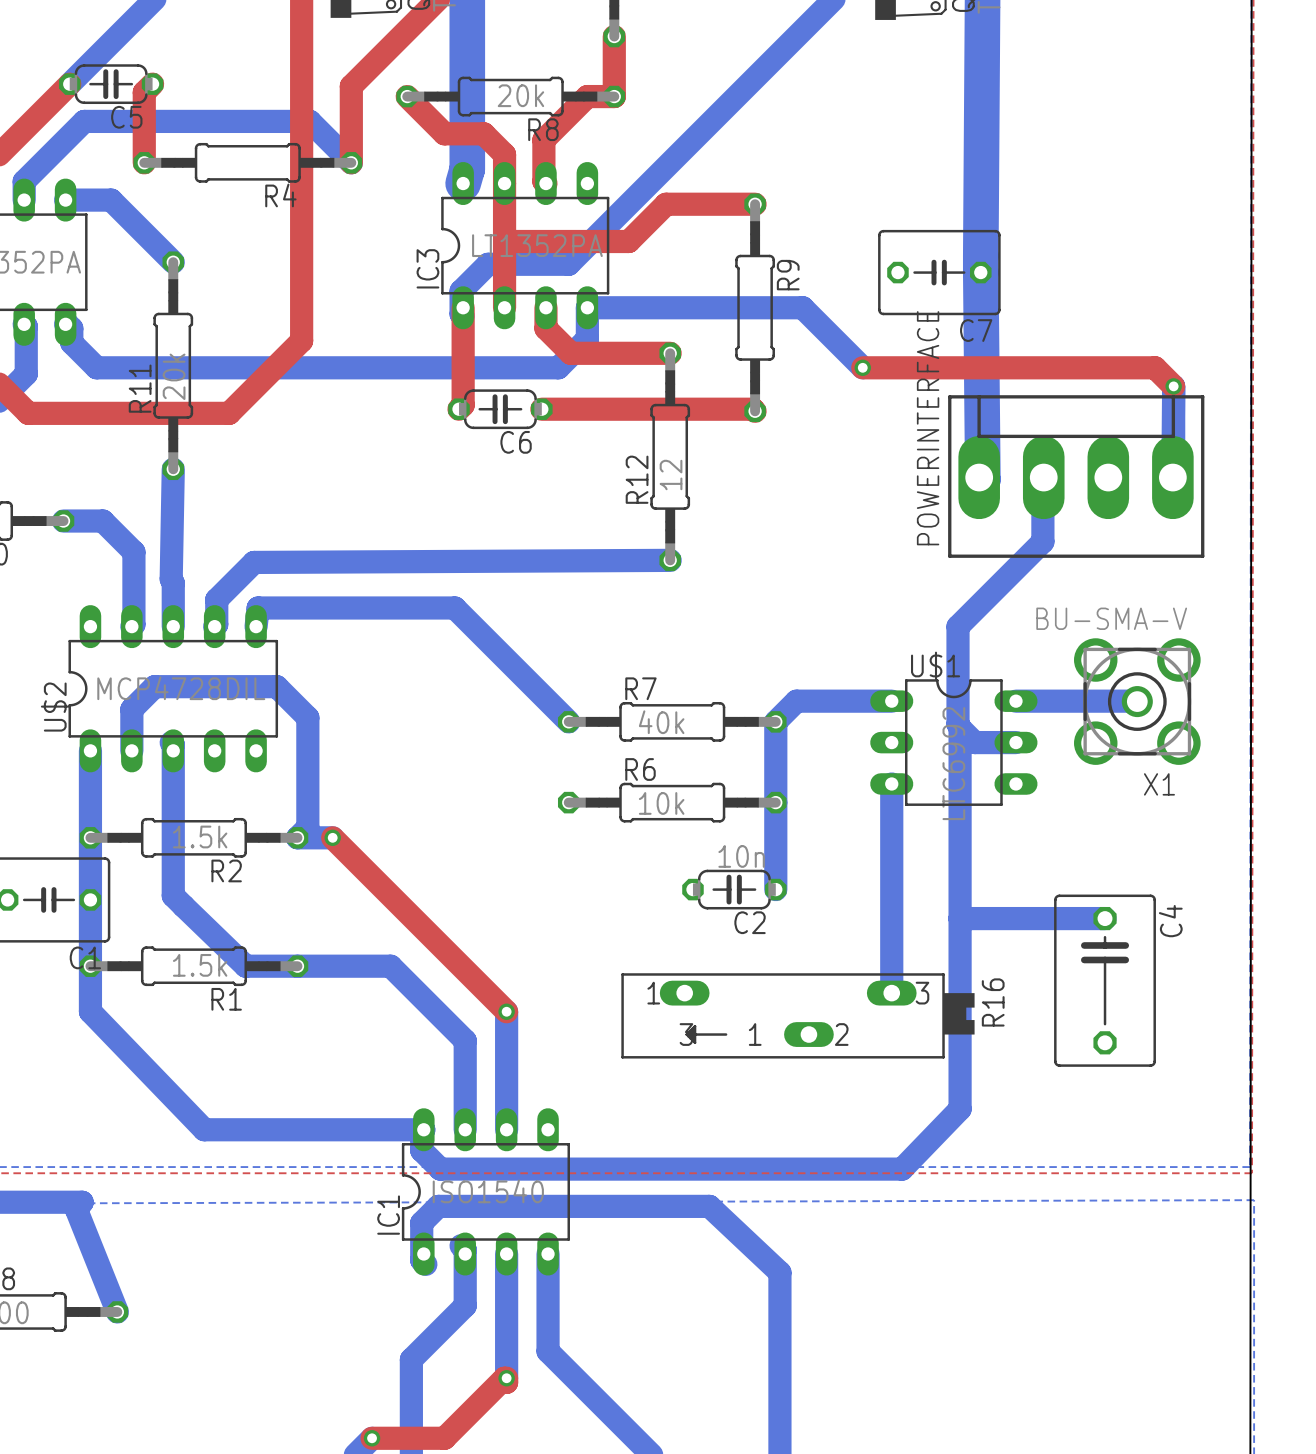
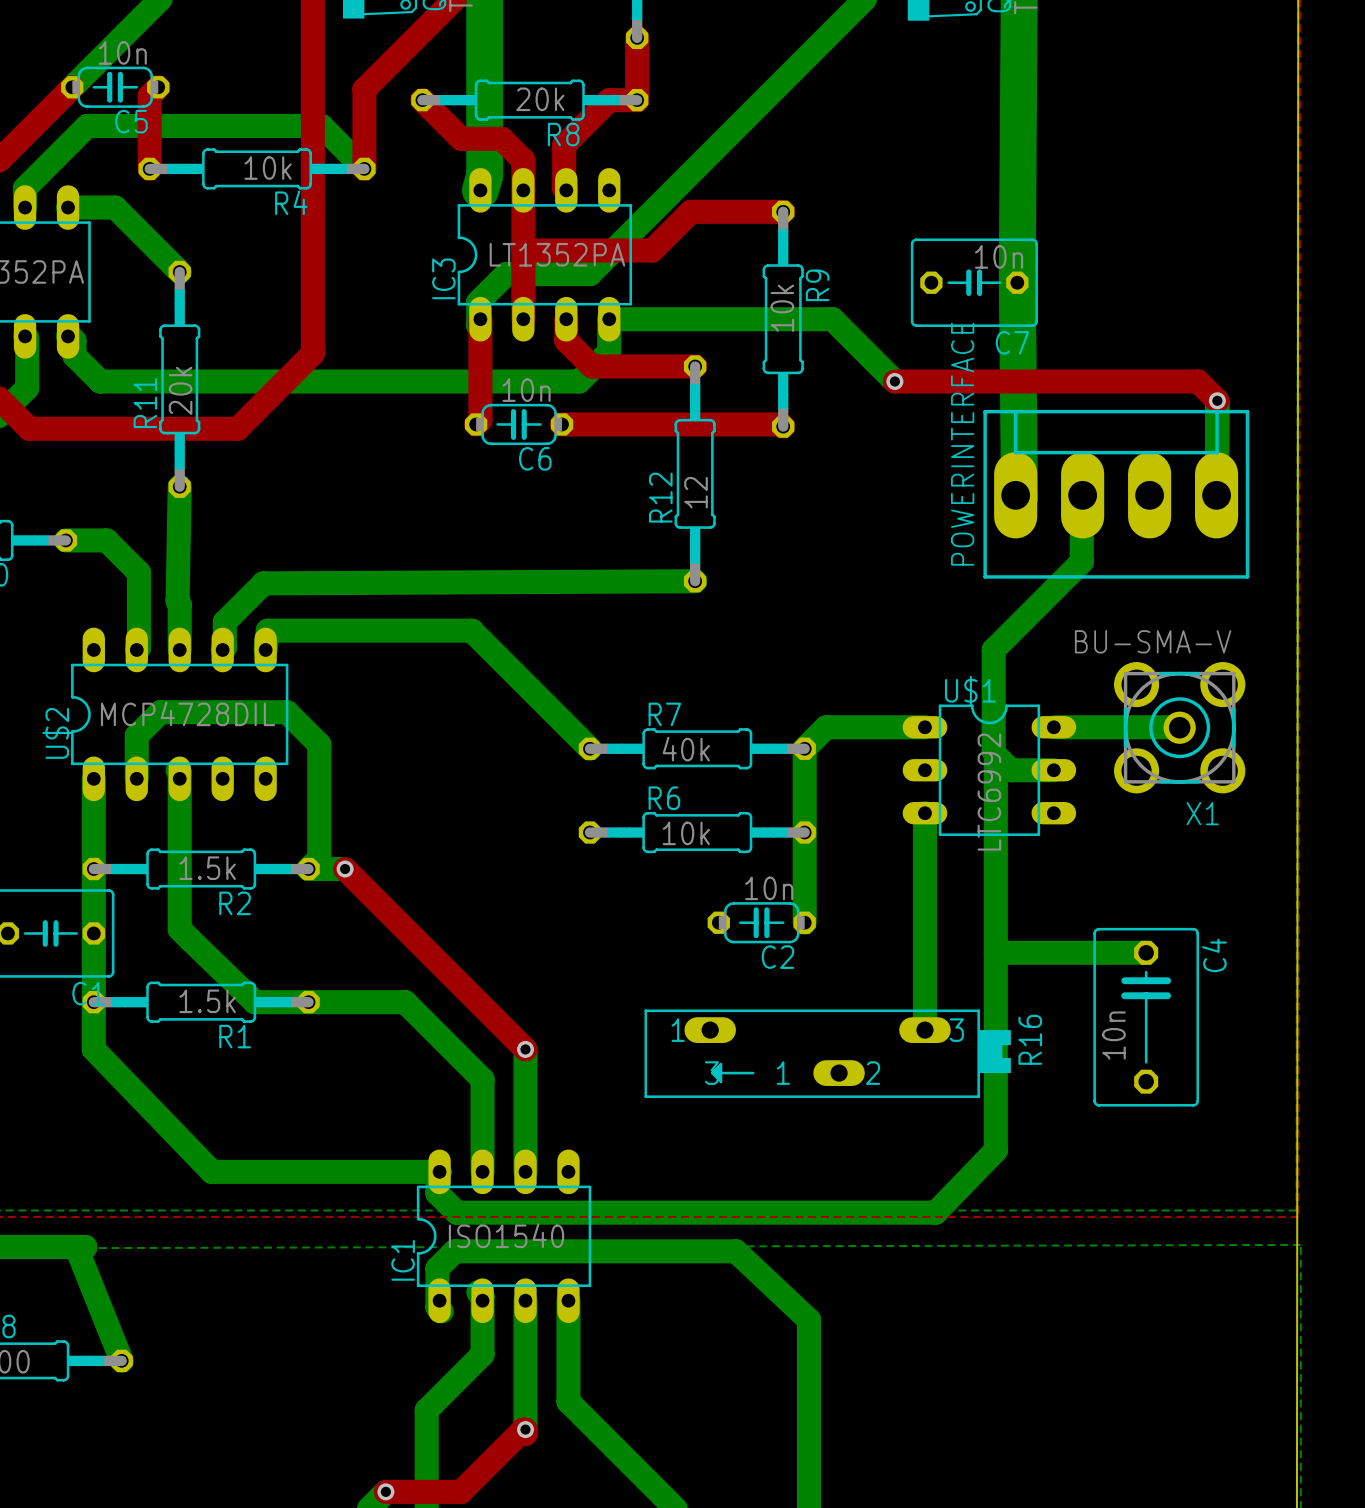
C5 value: none -> 10n (122, 52)
R4 value: none -> 10k (268, 168)
C7 value: none -> 10n (999, 256)
R9 value: none -> 10k (782, 308)
C6 value: none -> 10n (526, 390)
C4 value: none -> 10n (1113, 1035)

